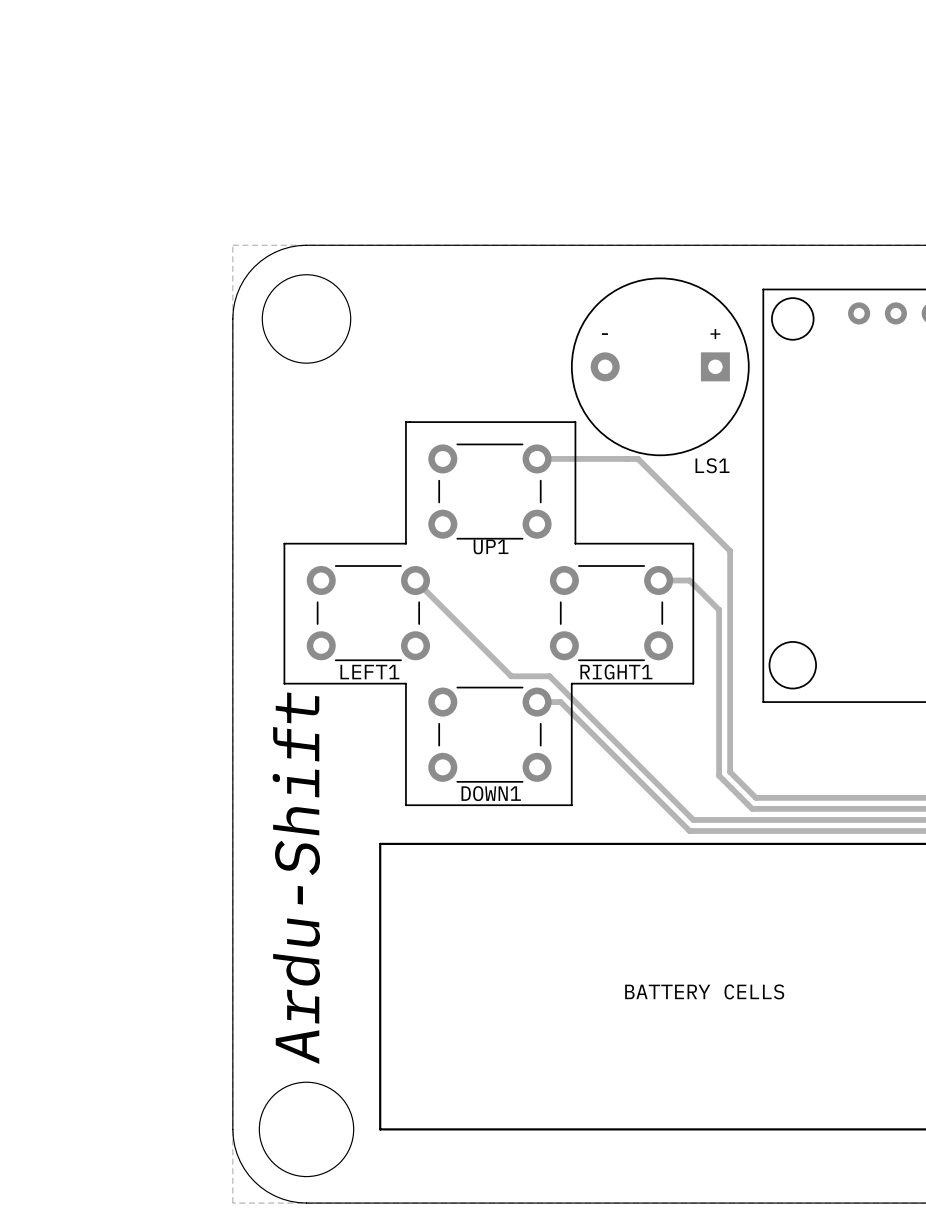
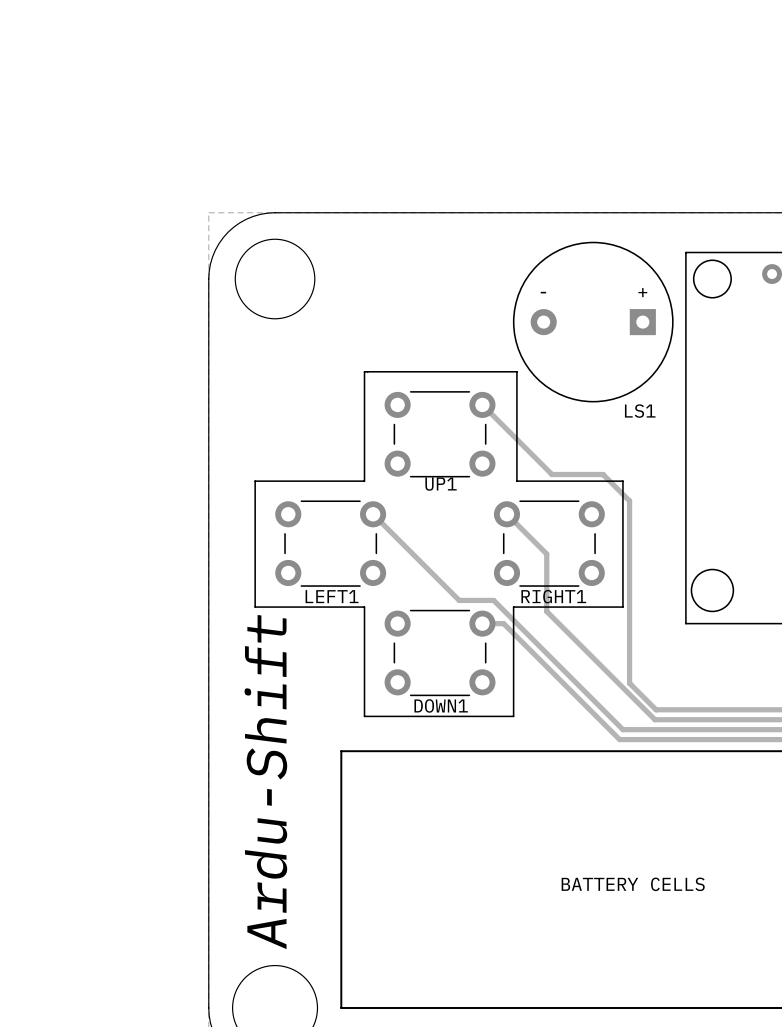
track: (537, 458) (638, 458) (730, 551) (730, 772) (755, 797) -> (482, 404) (552, 474) (603, 474) (629, 501) (629, 683) (656, 709) (679, 709)
track: (658, 580) (689, 580) (719, 609) (719, 775) (752, 808) -> (506, 514) (546, 554) (546, 611) (654, 719) (675, 719)

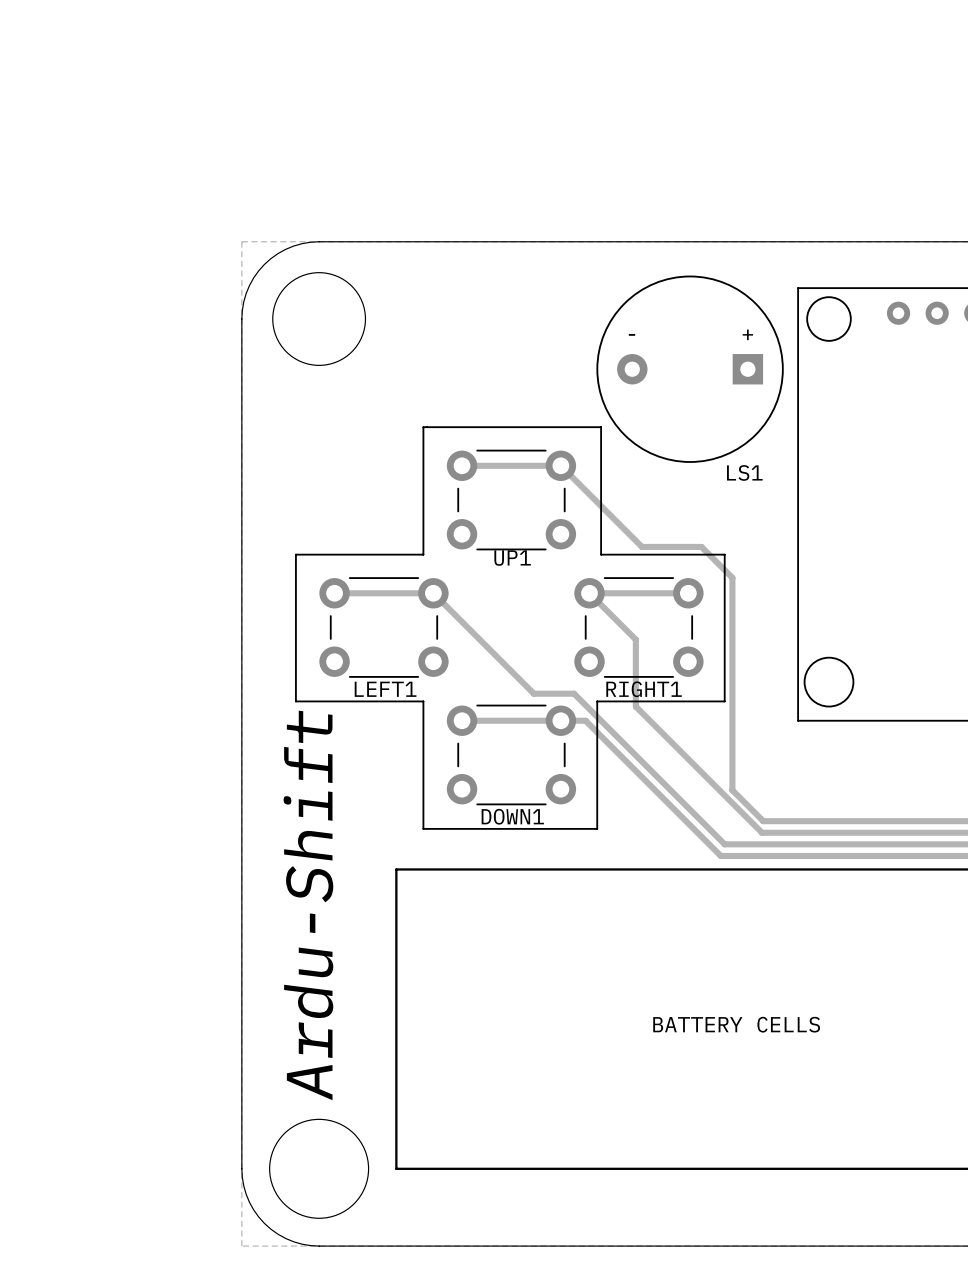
track: none -> (462, 465) (560, 465)
track: none -> (334, 593) (433, 593)
track: none -> (589, 593) (688, 593)
track: none -> (462, 720) (560, 720)

